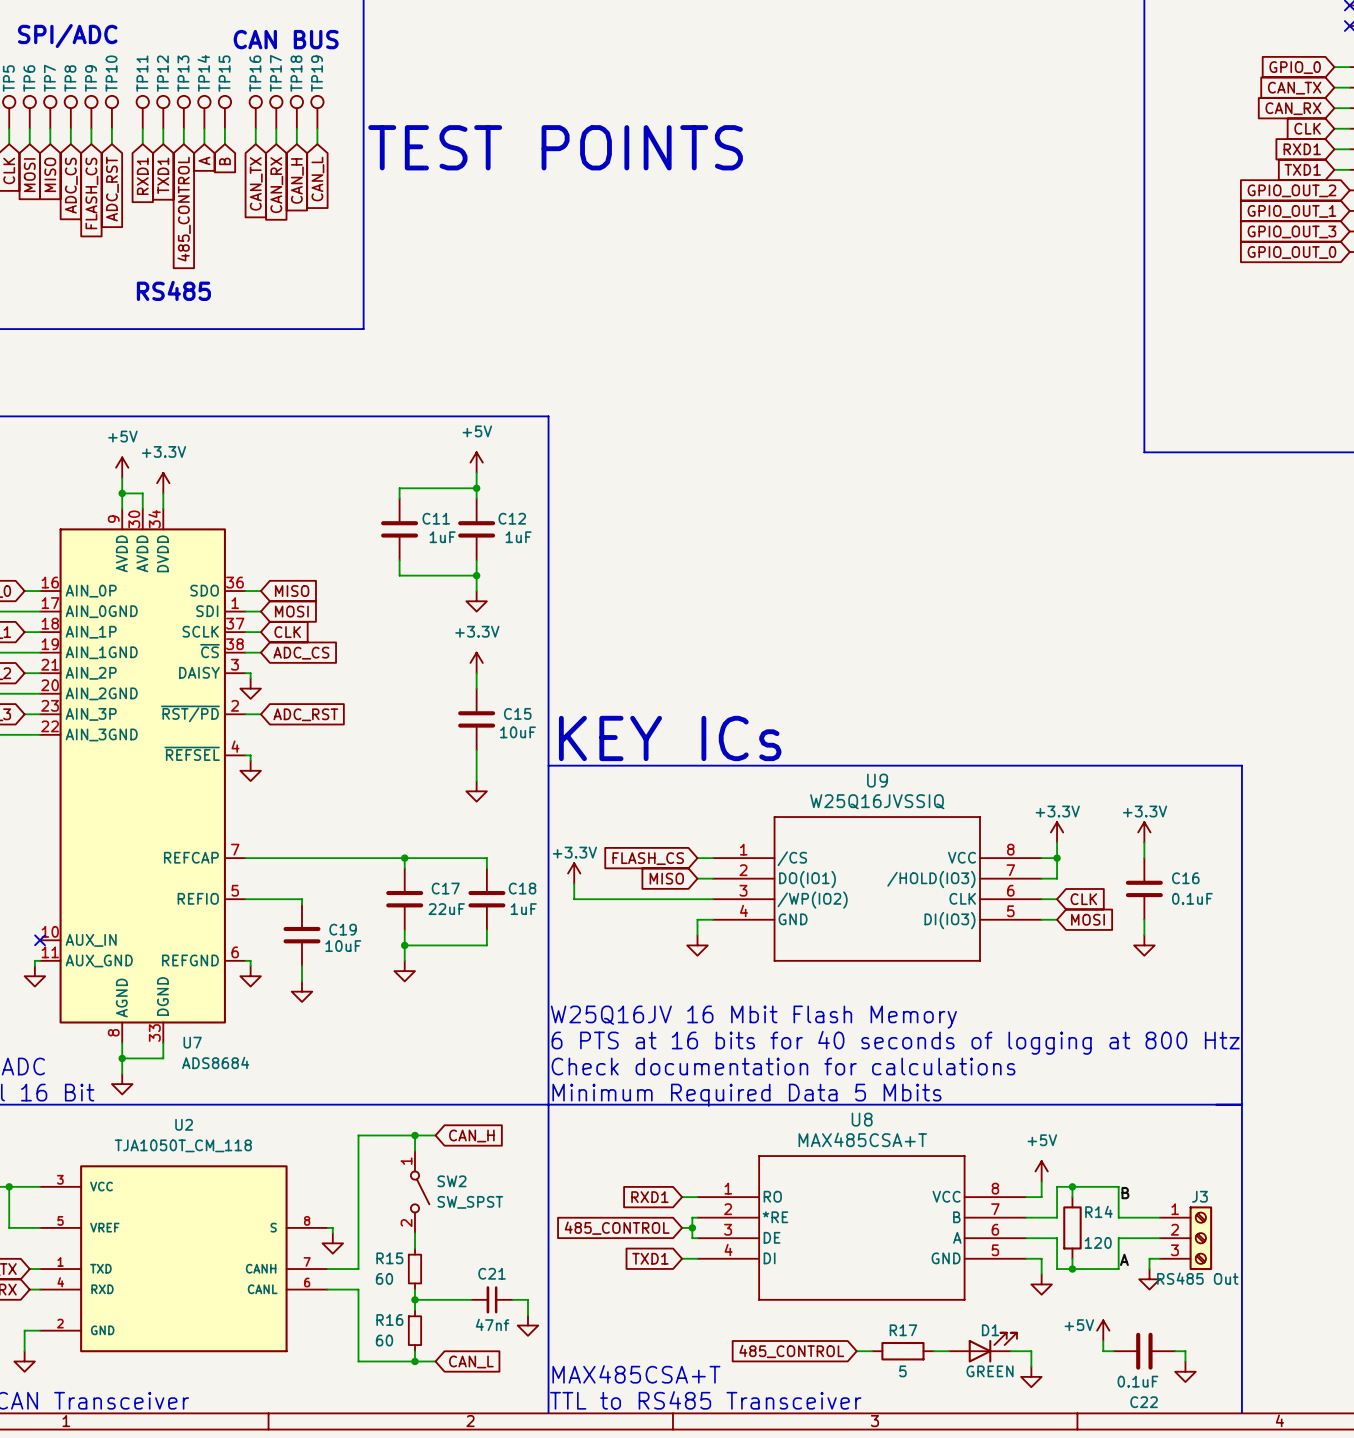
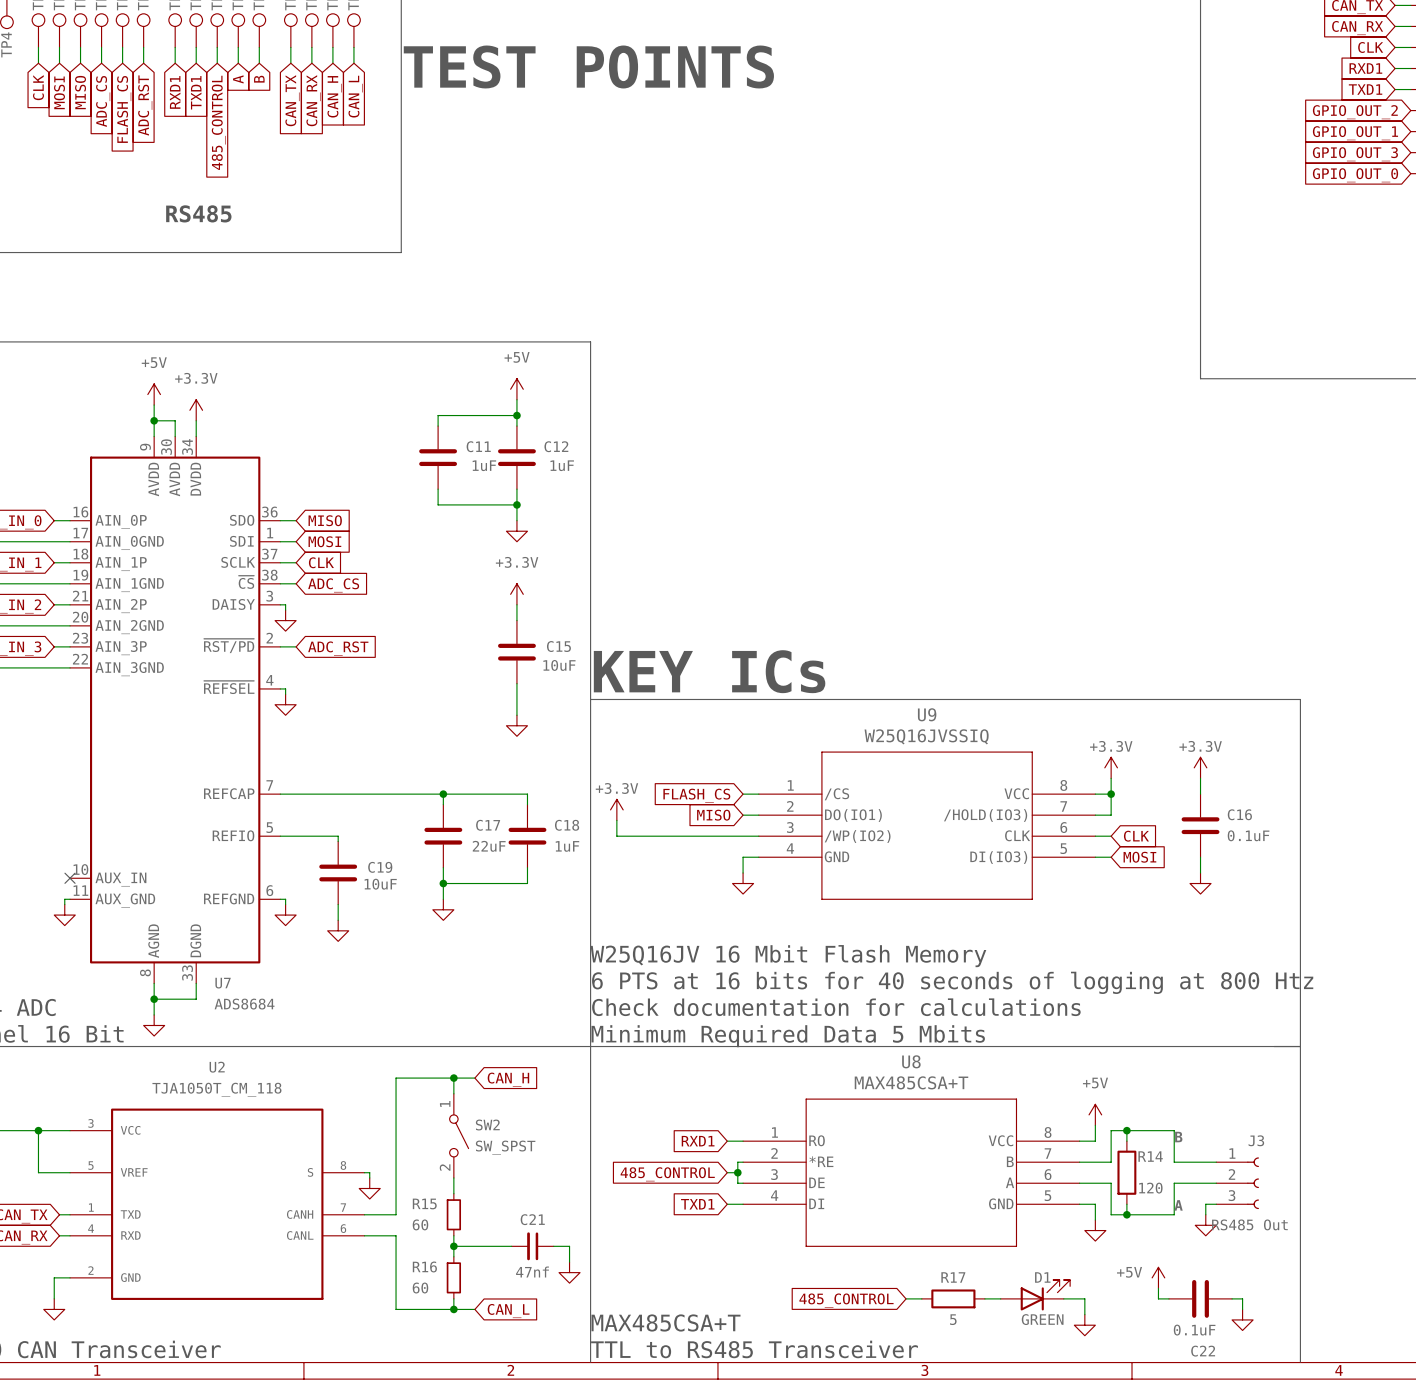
J3 symbol: [1159, 1206, 1213, 1271] -> [1216, 1157, 1259, 1210]

